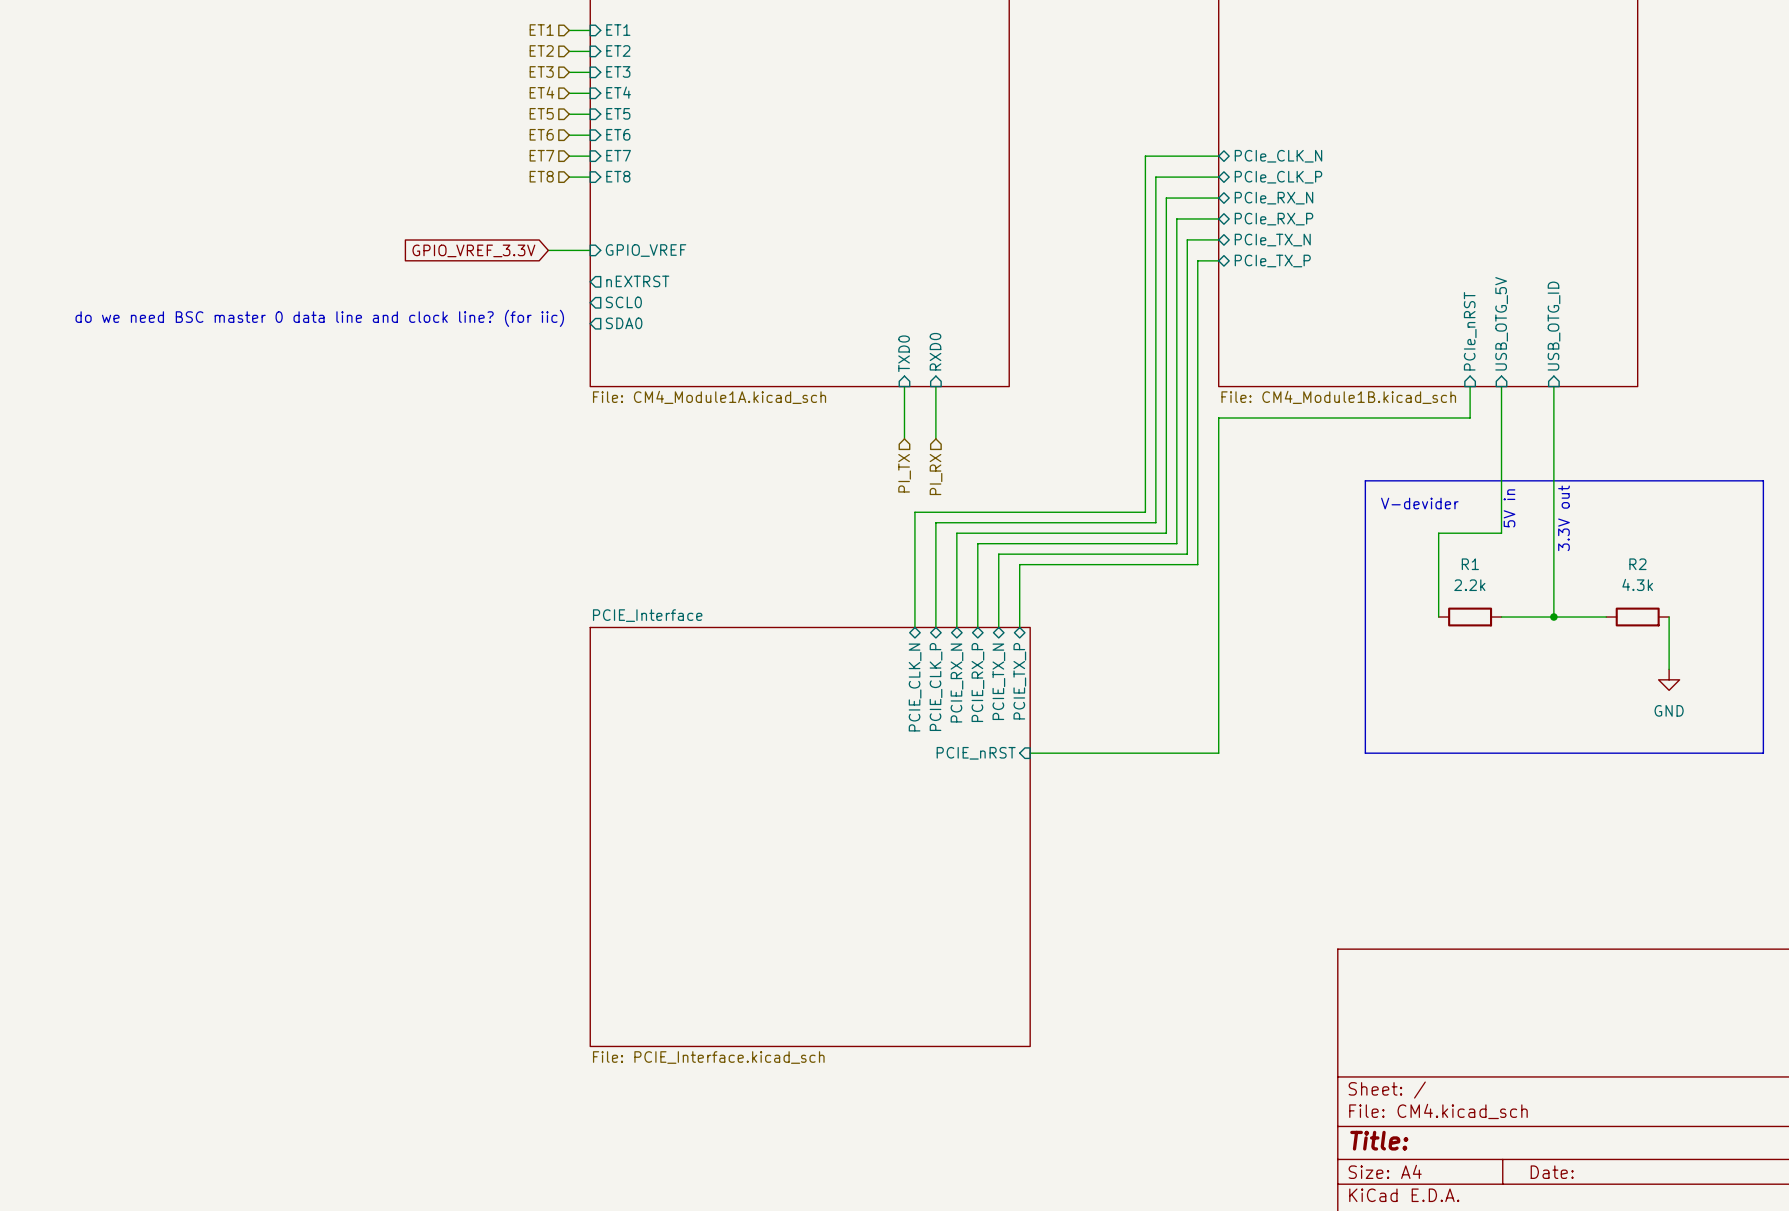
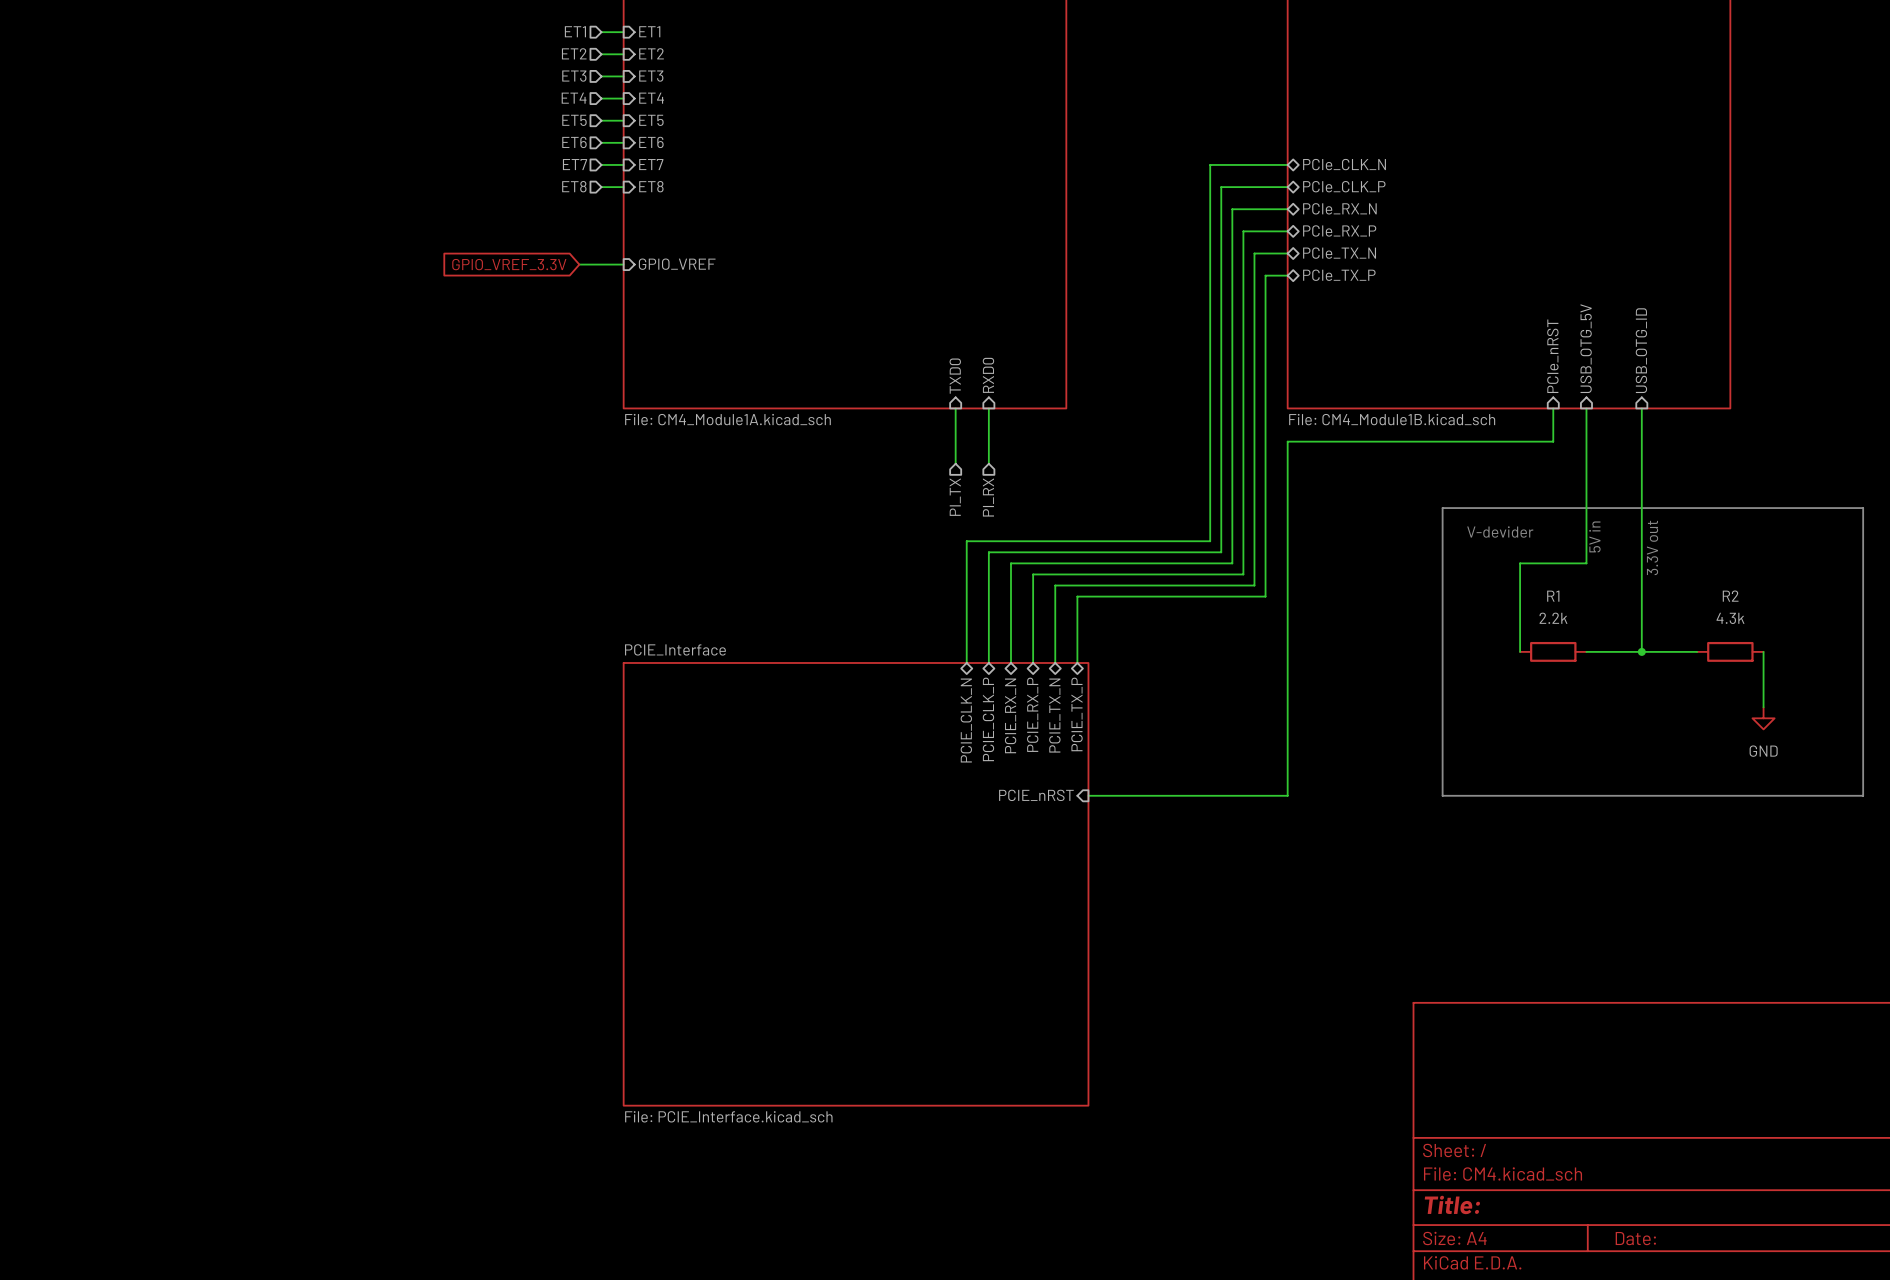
sheet pin: nEXTRST (637, 281) -> none
sheet pin: SCL0 (623, 302) -> none
text: do we need BSC master 0 data line and clock line? (for iic) (319, 318) -> none
sheet pin: SDA0 (624, 323) -> none

